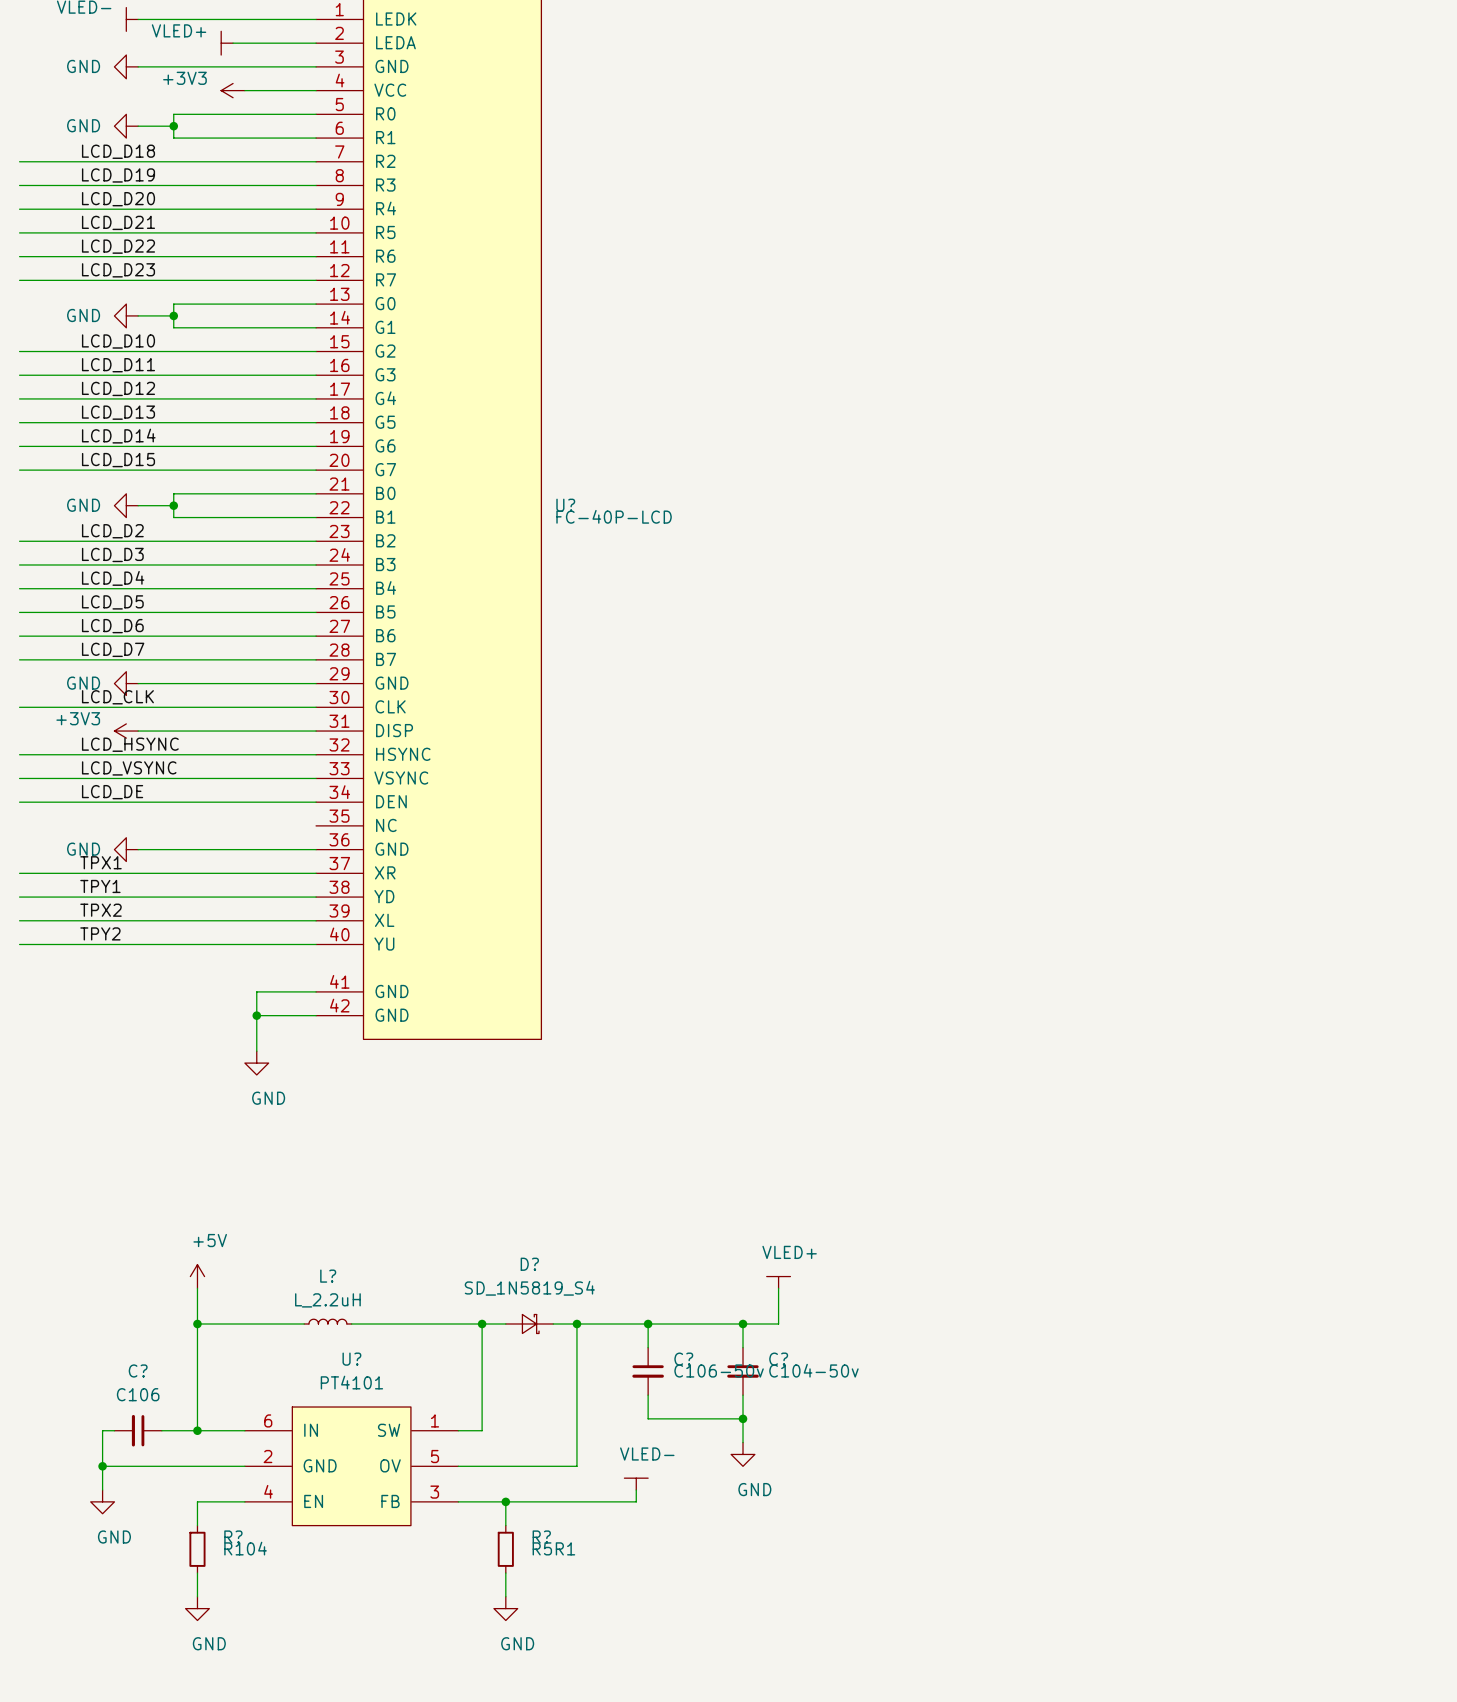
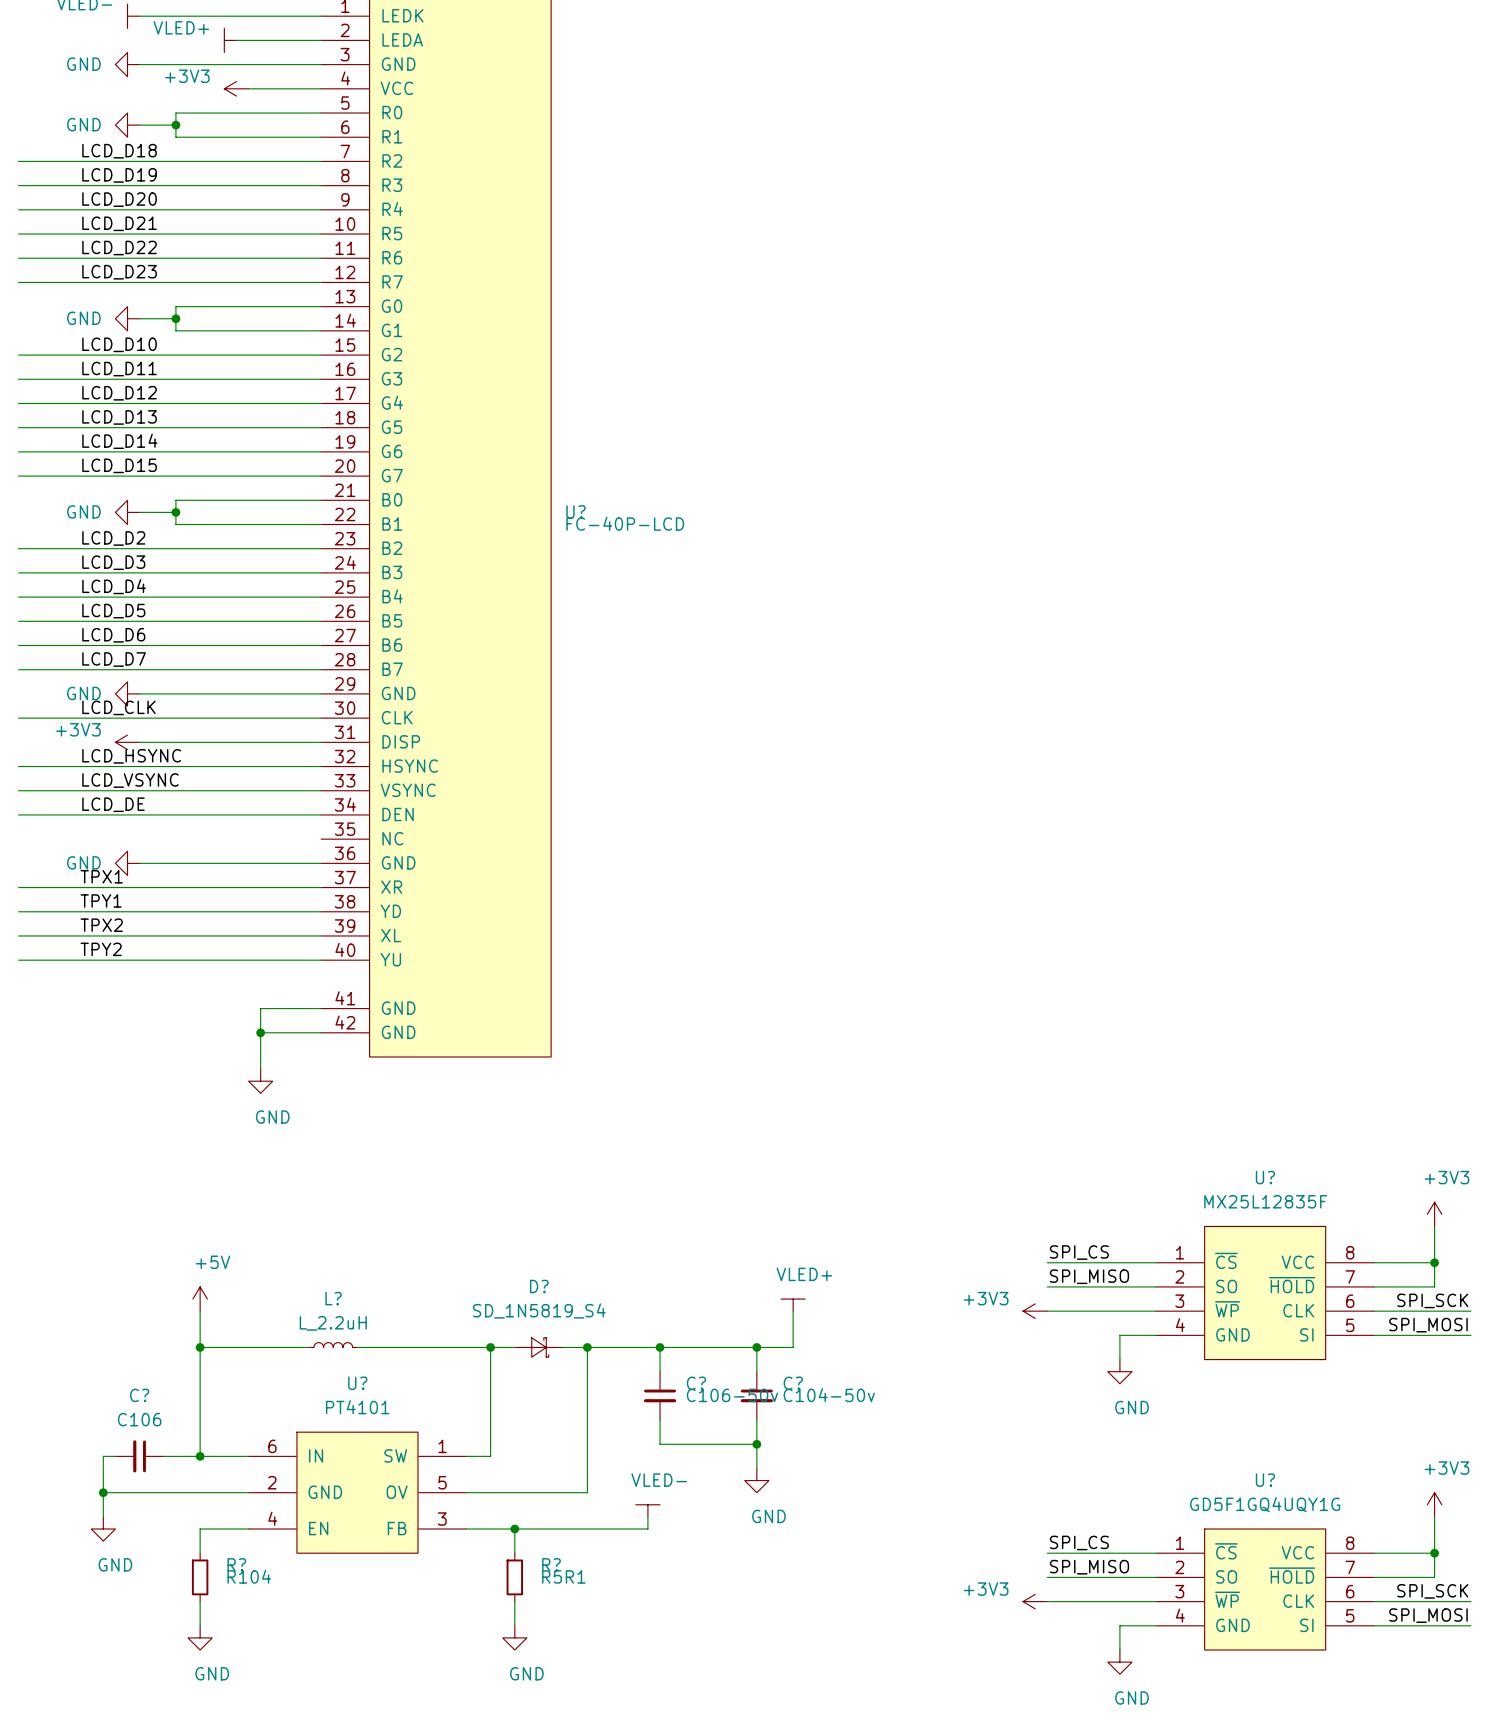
power symbol: none -> +3V3 (1434, 1214)
wire: none -> (1434, 1226) (1434, 1286) (1374, 1286)
label: none -> SPI_CS (1079, 1252)
wire: none -> (1047, 1262) (1156, 1262)
wire: none -> (1374, 1262) (1434, 1262)
junction: none -> (1434, 1262)
label: none -> SPI_MISO (1089, 1276)
wire: none -> (1047, 1286) (1156, 1286)
U?: none -> MX25L12835F (1265, 1293)
label: none -> SPI_SCK (1432, 1300)
power symbol: none -> +3V3 (1035, 1311)
wire: none -> (1047, 1311) (1156, 1311)
wire: none -> (1374, 1311) (1470, 1311)
label: none -> SPI_MOSI (1428, 1325)
wire: none -> (1156, 1335) (1119, 1335) (1119, 1359)
wire: none -> (1374, 1335) (1470, 1335)
power symbol: none -> GND (1119, 1371)
power symbol: none -> +3V3 (1434, 1504)
wire: none -> (1434, 1516) (1434, 1577) (1374, 1577)
label: none -> SPI_CS (1079, 1542)
wire: none -> (1047, 1553) (1156, 1553)
wire: none -> (1374, 1553) (1434, 1553)
junction: none -> (1434, 1553)
label: none -> SPI_MISO (1089, 1567)
wire: none -> (1047, 1577) (1156, 1577)
U?: none -> GD5F1GQ4UQY1G (1265, 1589)
label: none -> SPI_SCK (1432, 1591)
power symbol: none -> +3V3 (1035, 1601)
wire: none -> (1047, 1601) (1156, 1601)
wire: none -> (1374, 1601) (1470, 1601)
label: none -> SPI_MOSI (1428, 1615)
wire: none -> (1156, 1625) (1119, 1625) (1119, 1650)
wire: none -> (1374, 1625) (1470, 1625)
power symbol: none -> GND (1119, 1662)

